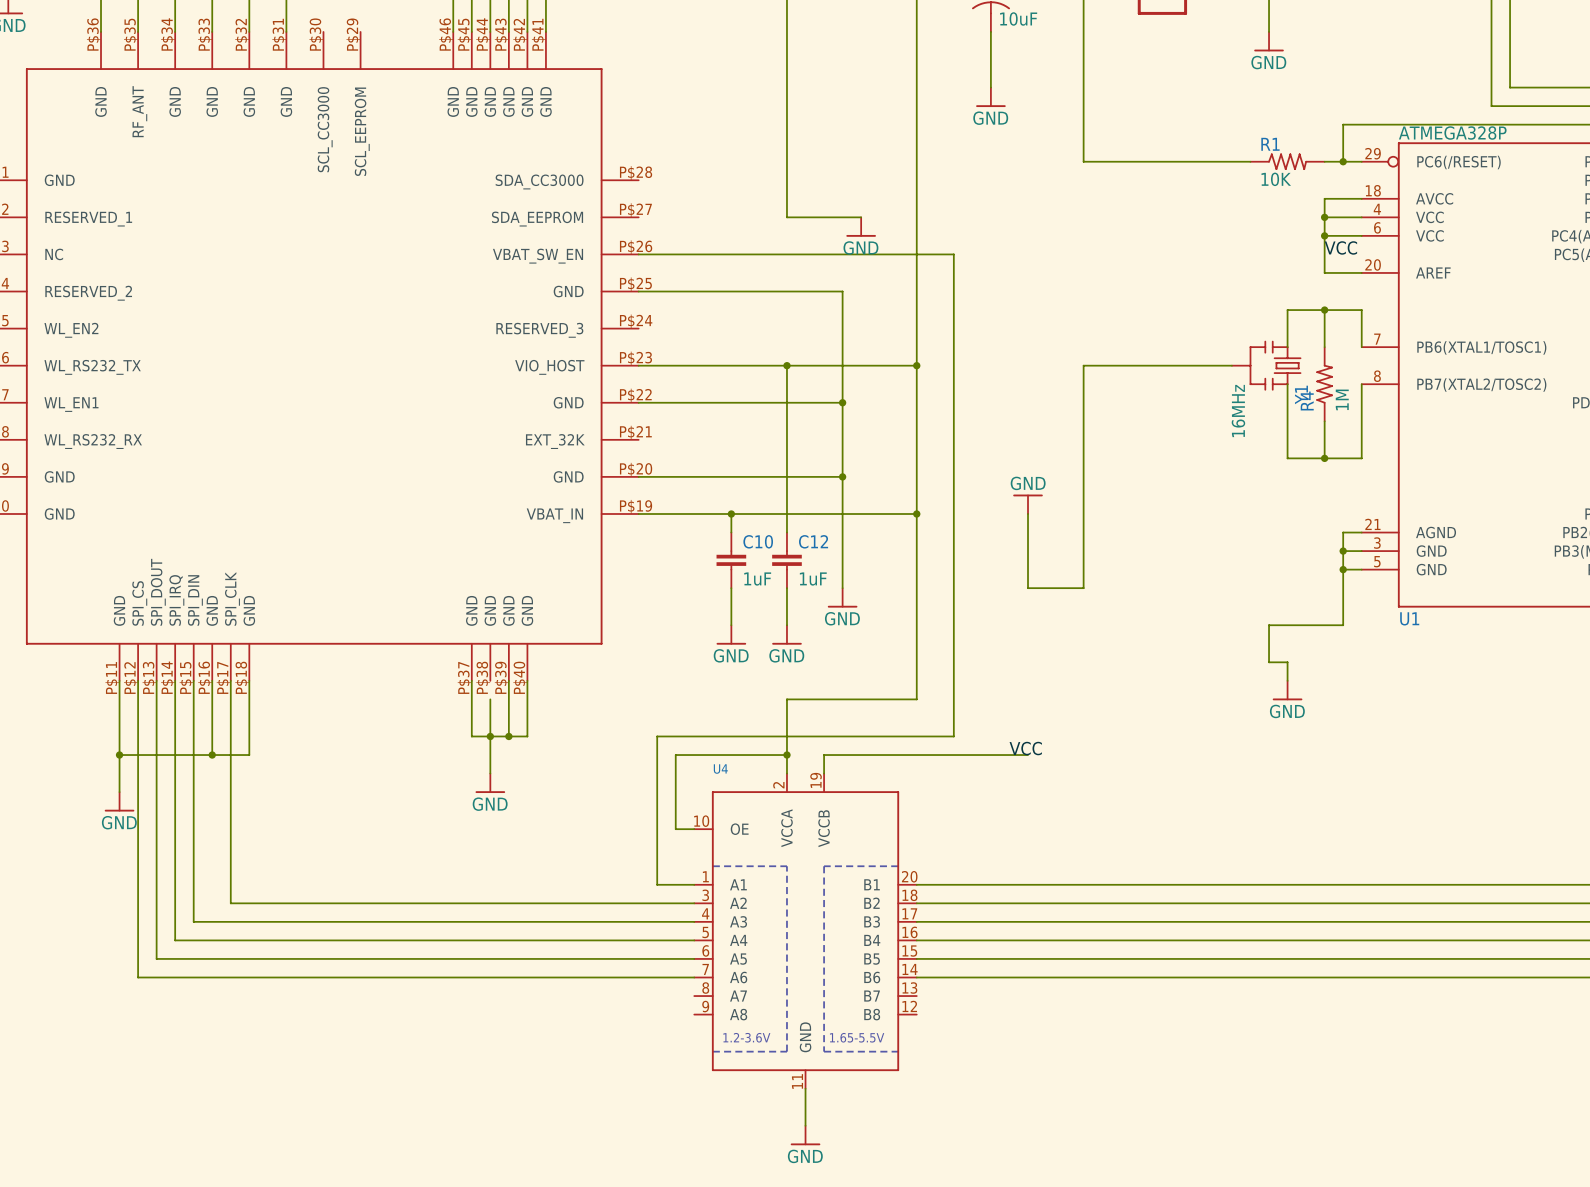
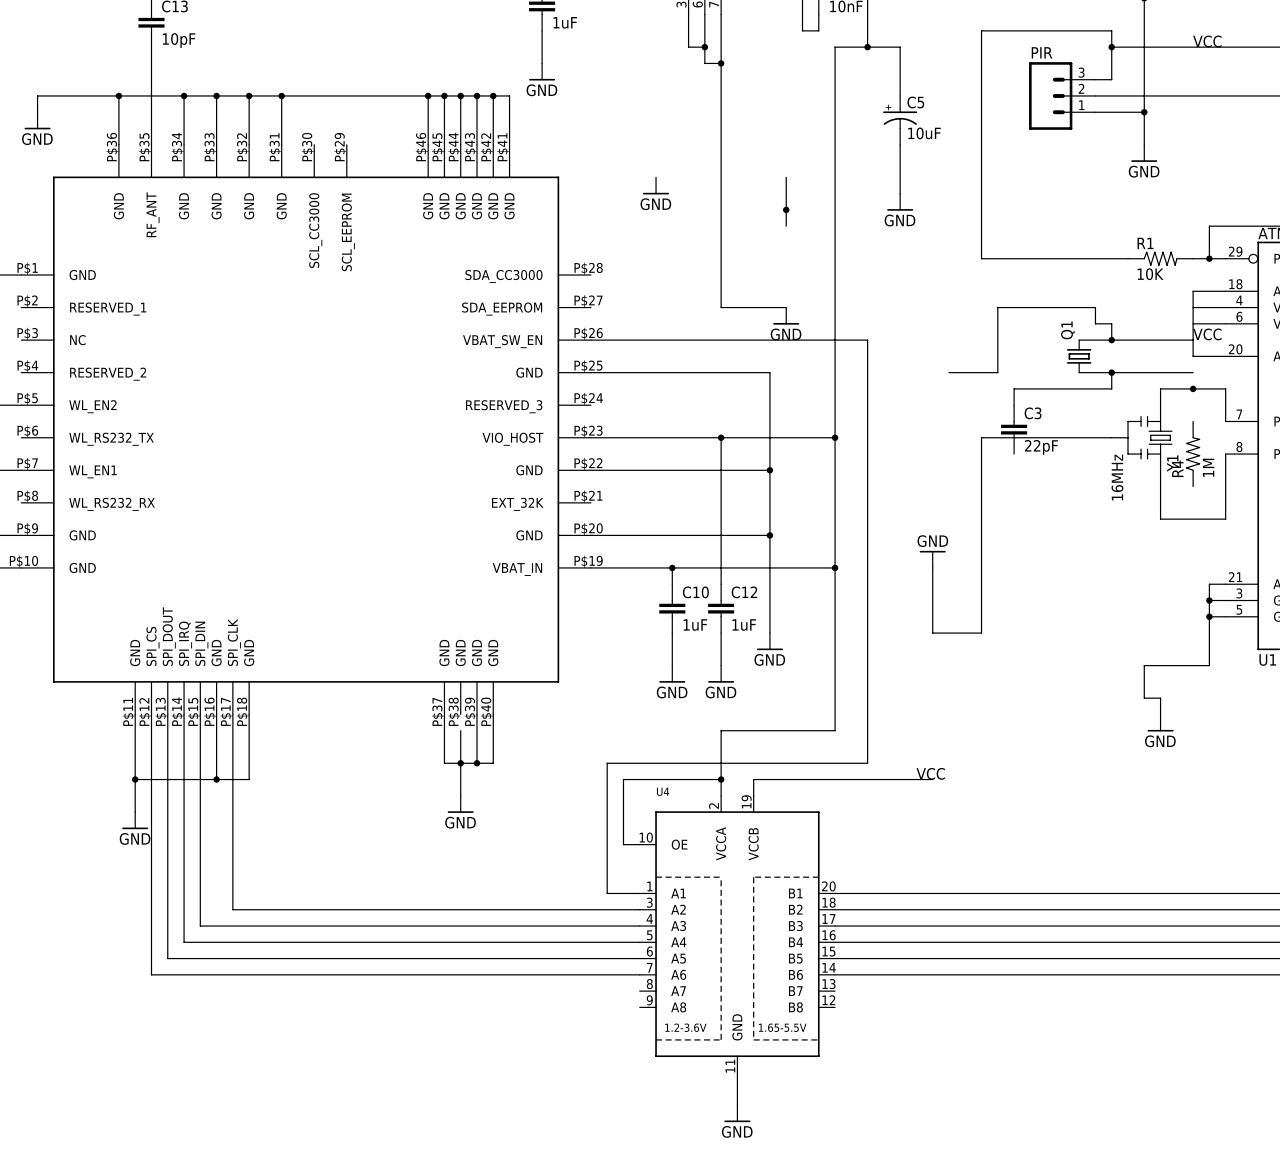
wire: none -> (786, 177) (786, 226)
power symbol: none -> GND (656, 185)
junction: none -> (786, 209)
junction: (1324, 217) -> none
junction: (1324, 235) -> none
wire: none -> (1079, 340) (1193, 340)
wire: none -> (1111, 340) (1111, 323) (1095, 323) (1095, 307) (997, 307) (997, 372) (948, 372)
junction: none -> (1111, 340)
Q1: none -> (1079, 356)
wire: none -> (1079, 372) (1193, 372)
wire: none -> (1111, 372) (1111, 388) (1014, 388) (1014, 405)
junction: none -> (1111, 372)
wire: (1324, 310) (1324, 347) -> none
C3: none -> 22pF (1014, 429)
wire: (1324, 421) (1324, 458) -> none
junction: (1324, 458) -> none

